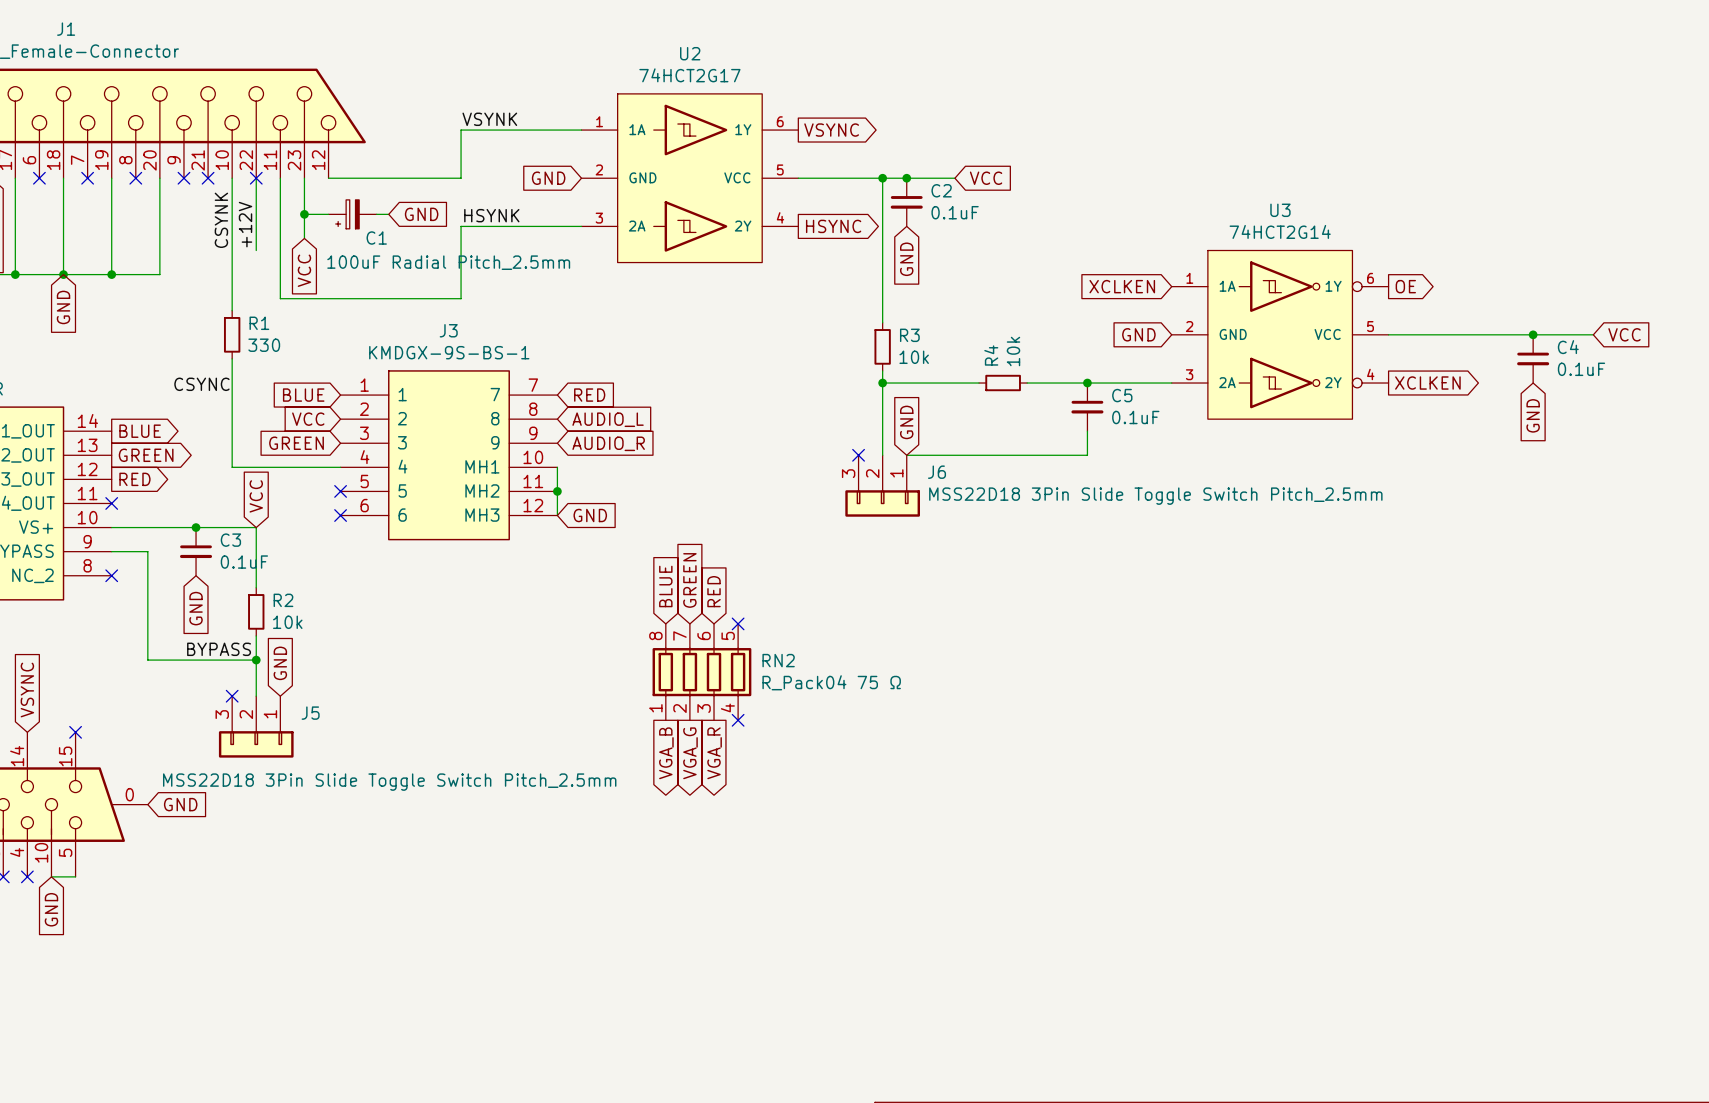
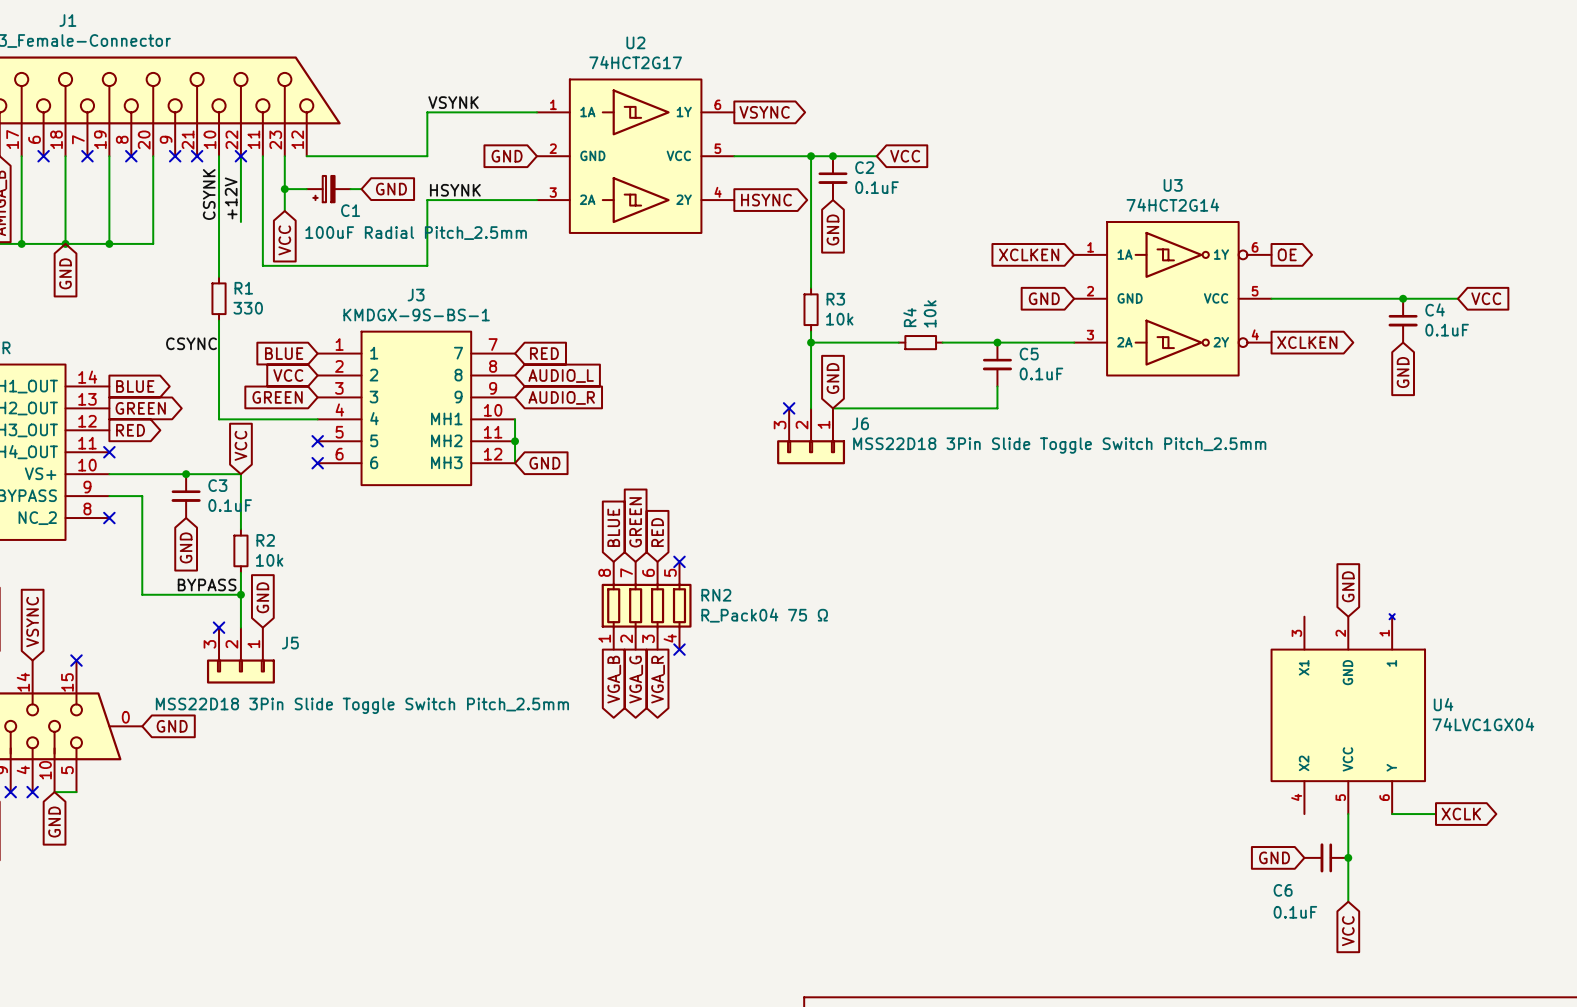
global label: none -> GND (1348, 586)
U4: none -> 74LVC1GX04 (1348, 714)
wire: none -> (1348, 814) (1348, 901)
wire: none -> (1392, 814) (1435, 814)
global label: none -> XCLK (1461, 814)
global label: none -> GND (1274, 857)
C6: none -> 0.1uF (1326, 857)
junction: none -> (1348, 857)
global label: none -> VCC (1348, 931)

